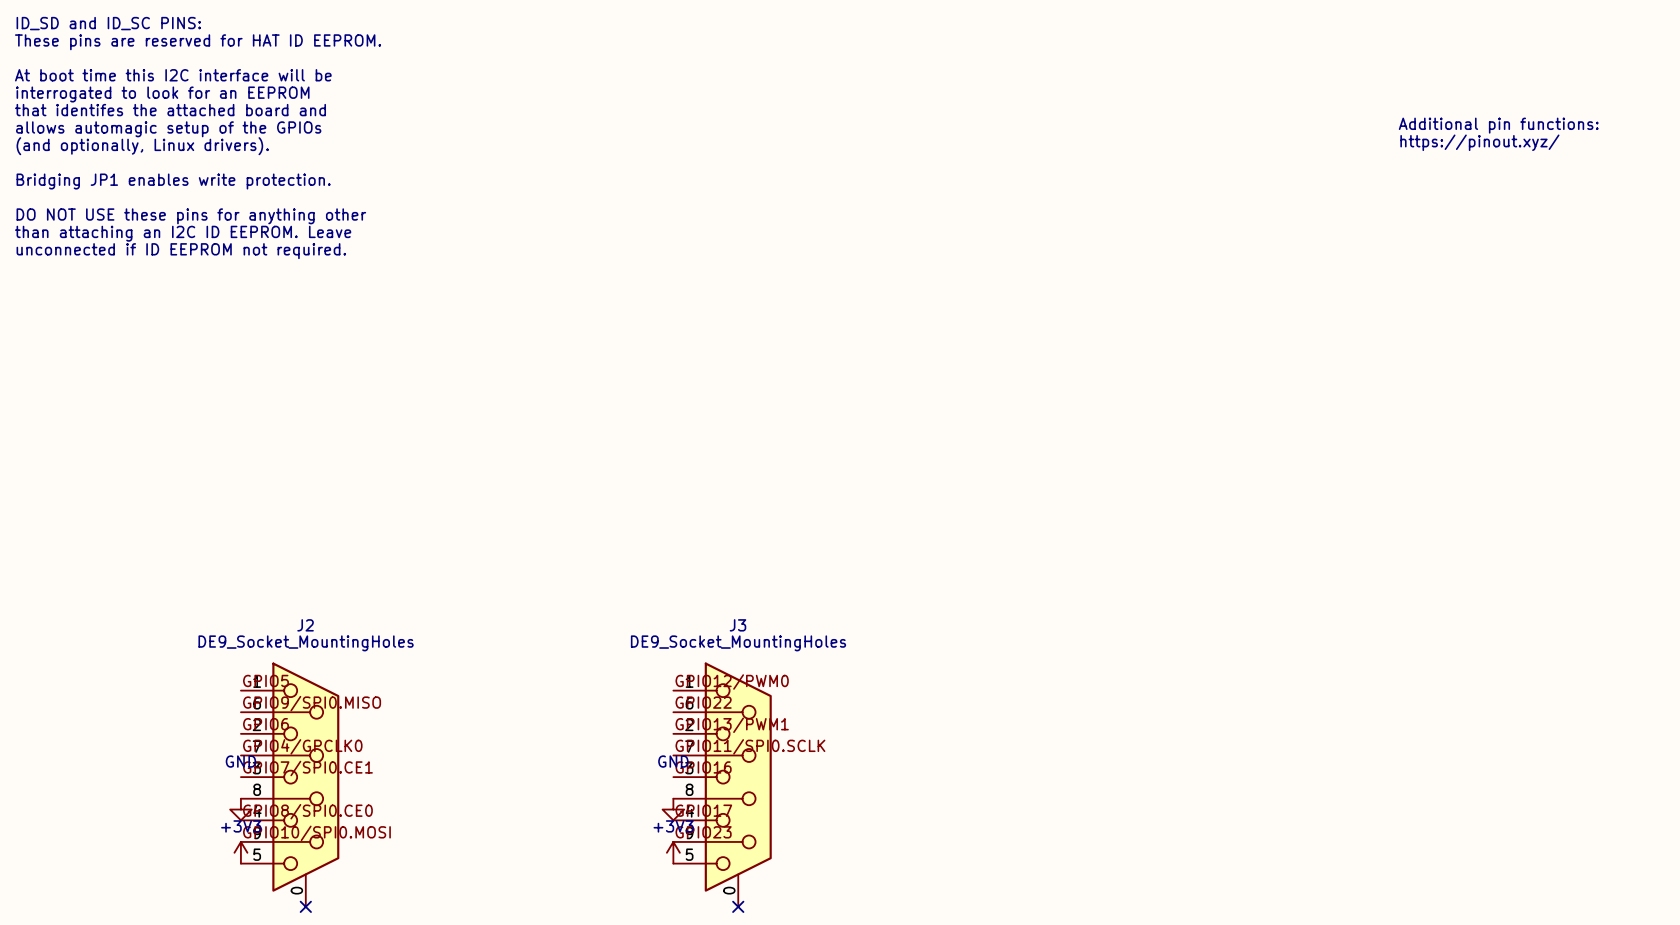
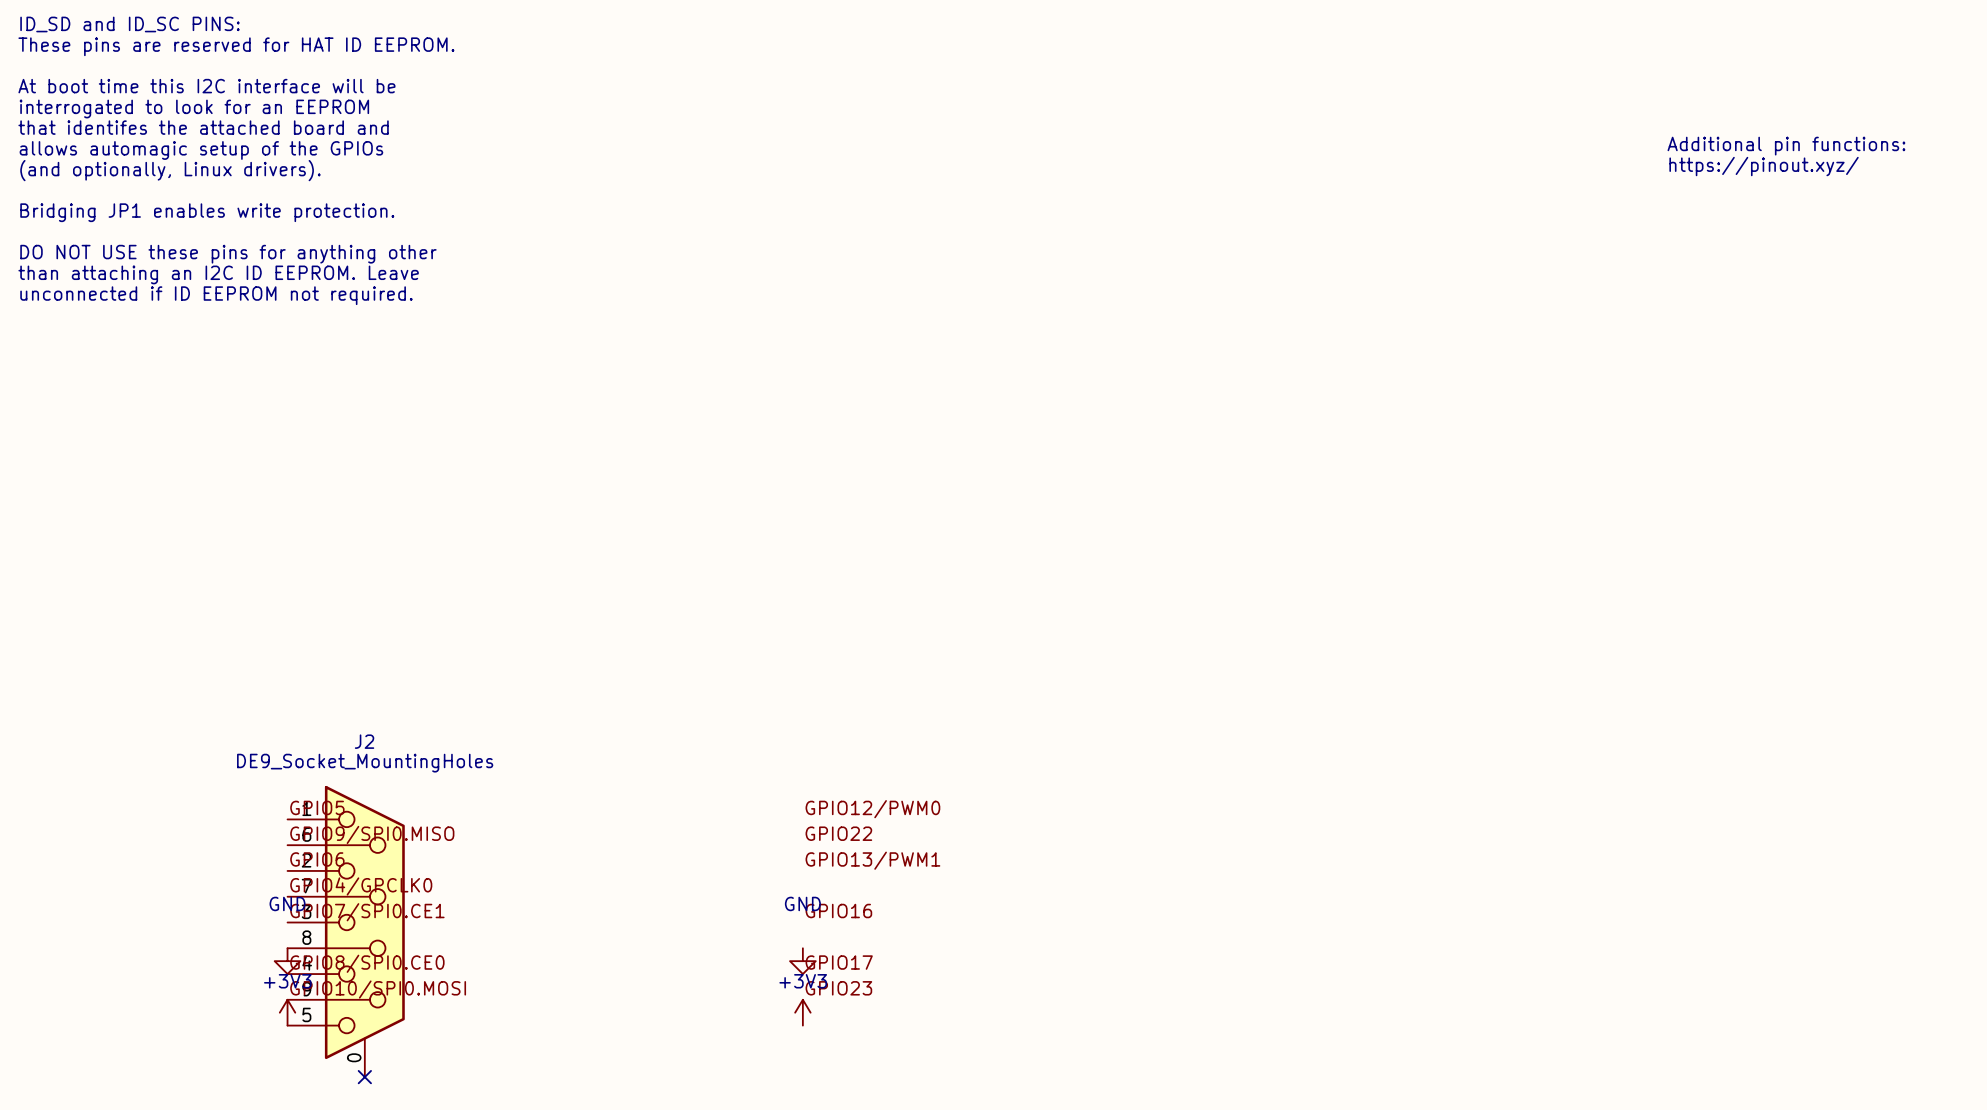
label: GPIO11/SPI0.SCLK (750, 746) -> none
J3: DE9_Socket_MountingHoles (722, 784) -> none
no-connect mark: (738, 906) -> none

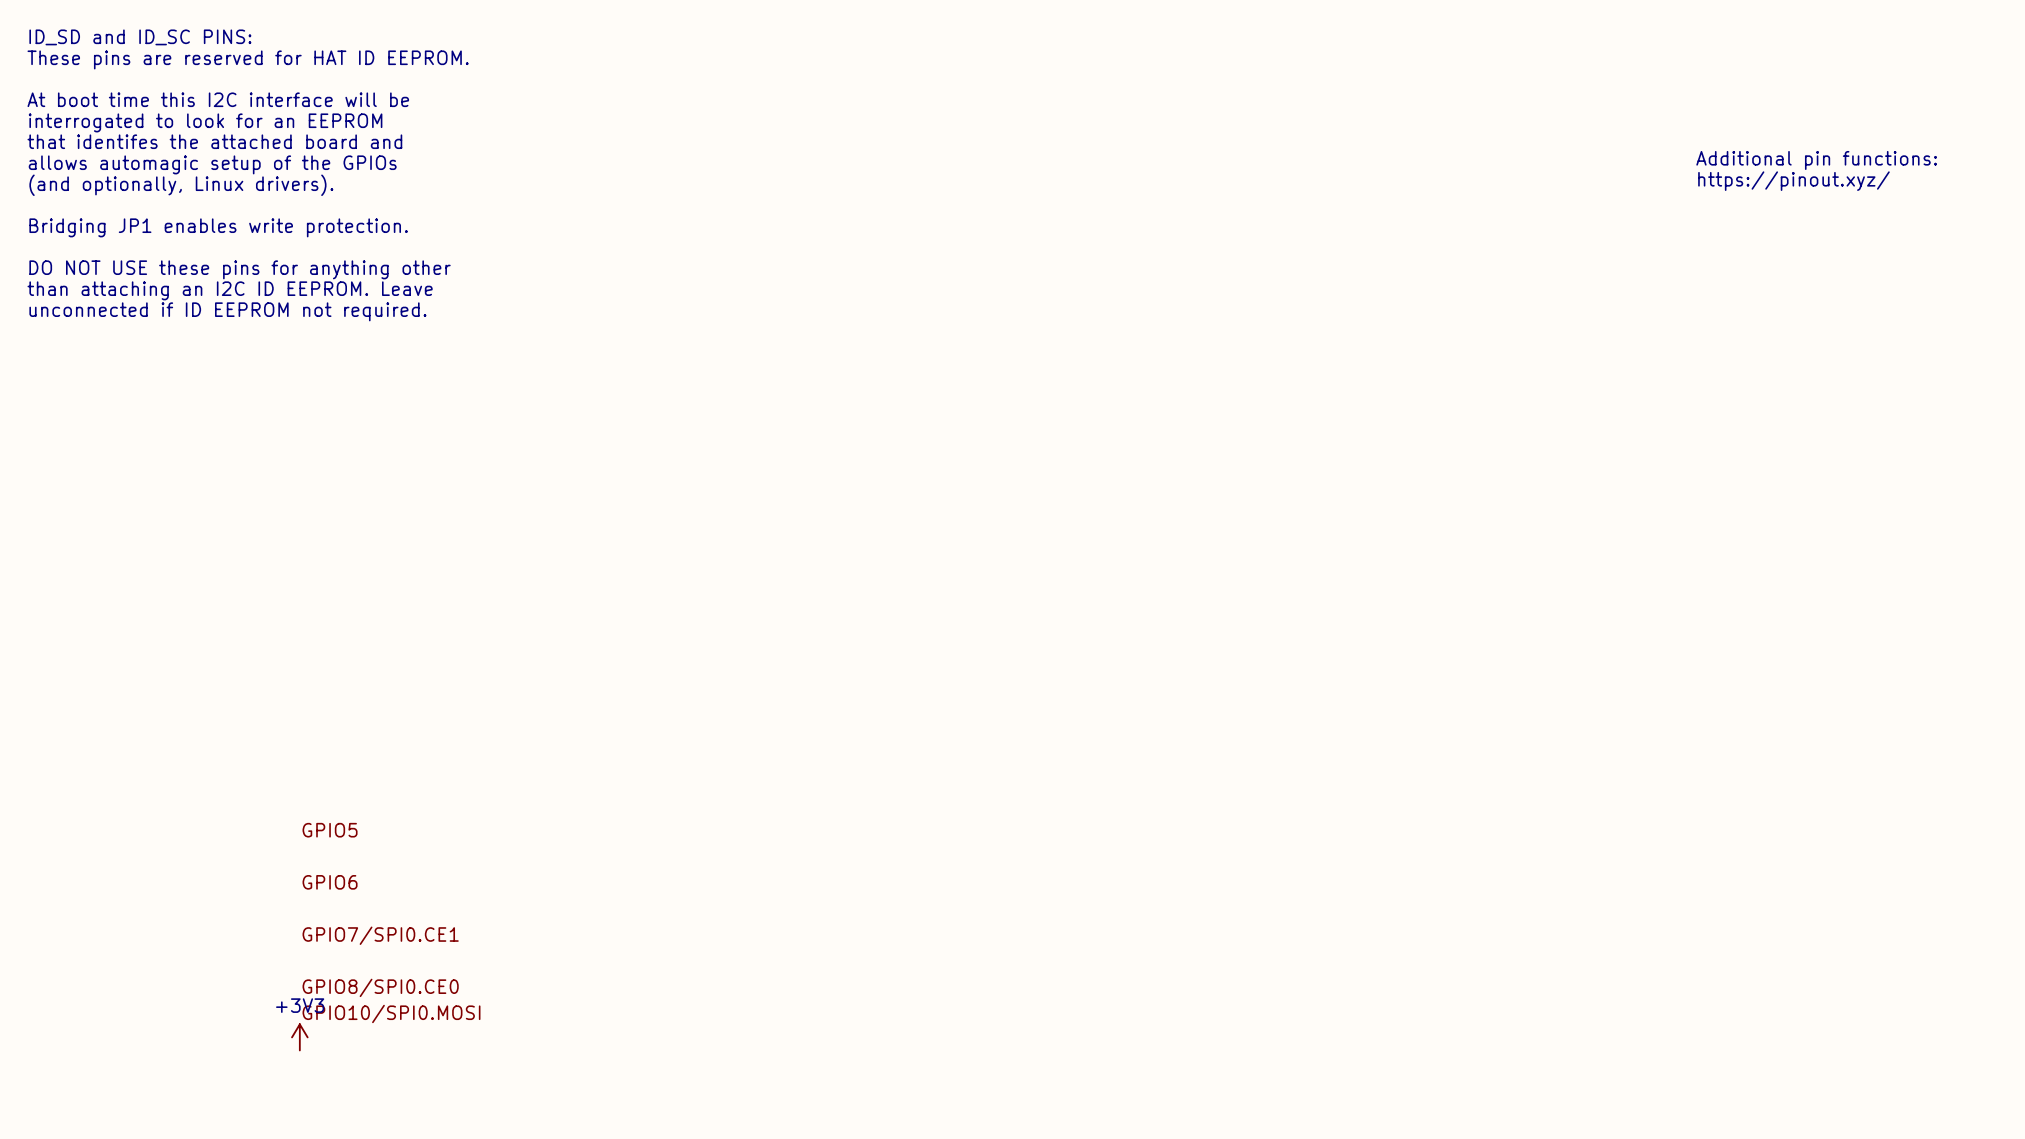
label: GPIO12/PWM0 (872, 809) -> none
label: GPIO22 (838, 833) -> none
label: GPIO9/SPI0.MISO (372, 834) -> none
label: GPIO13/PWM1 (872, 860) -> none
label: GPIO4/GPCLK0 (361, 886) -> none
label: GPIO16 (838, 911) -> none
J2: DE9_Socket_MountingHoles (346, 931) -> none
power symbol: GND (287, 961) -> none
power symbol: GND (802, 961) -> none
label: GPIO17 (839, 962) -> none
label: GPIO23 (838, 988) -> none
power symbol: +3V3 (802, 1012) -> none
no-connect mark: (364, 1077) -> none

